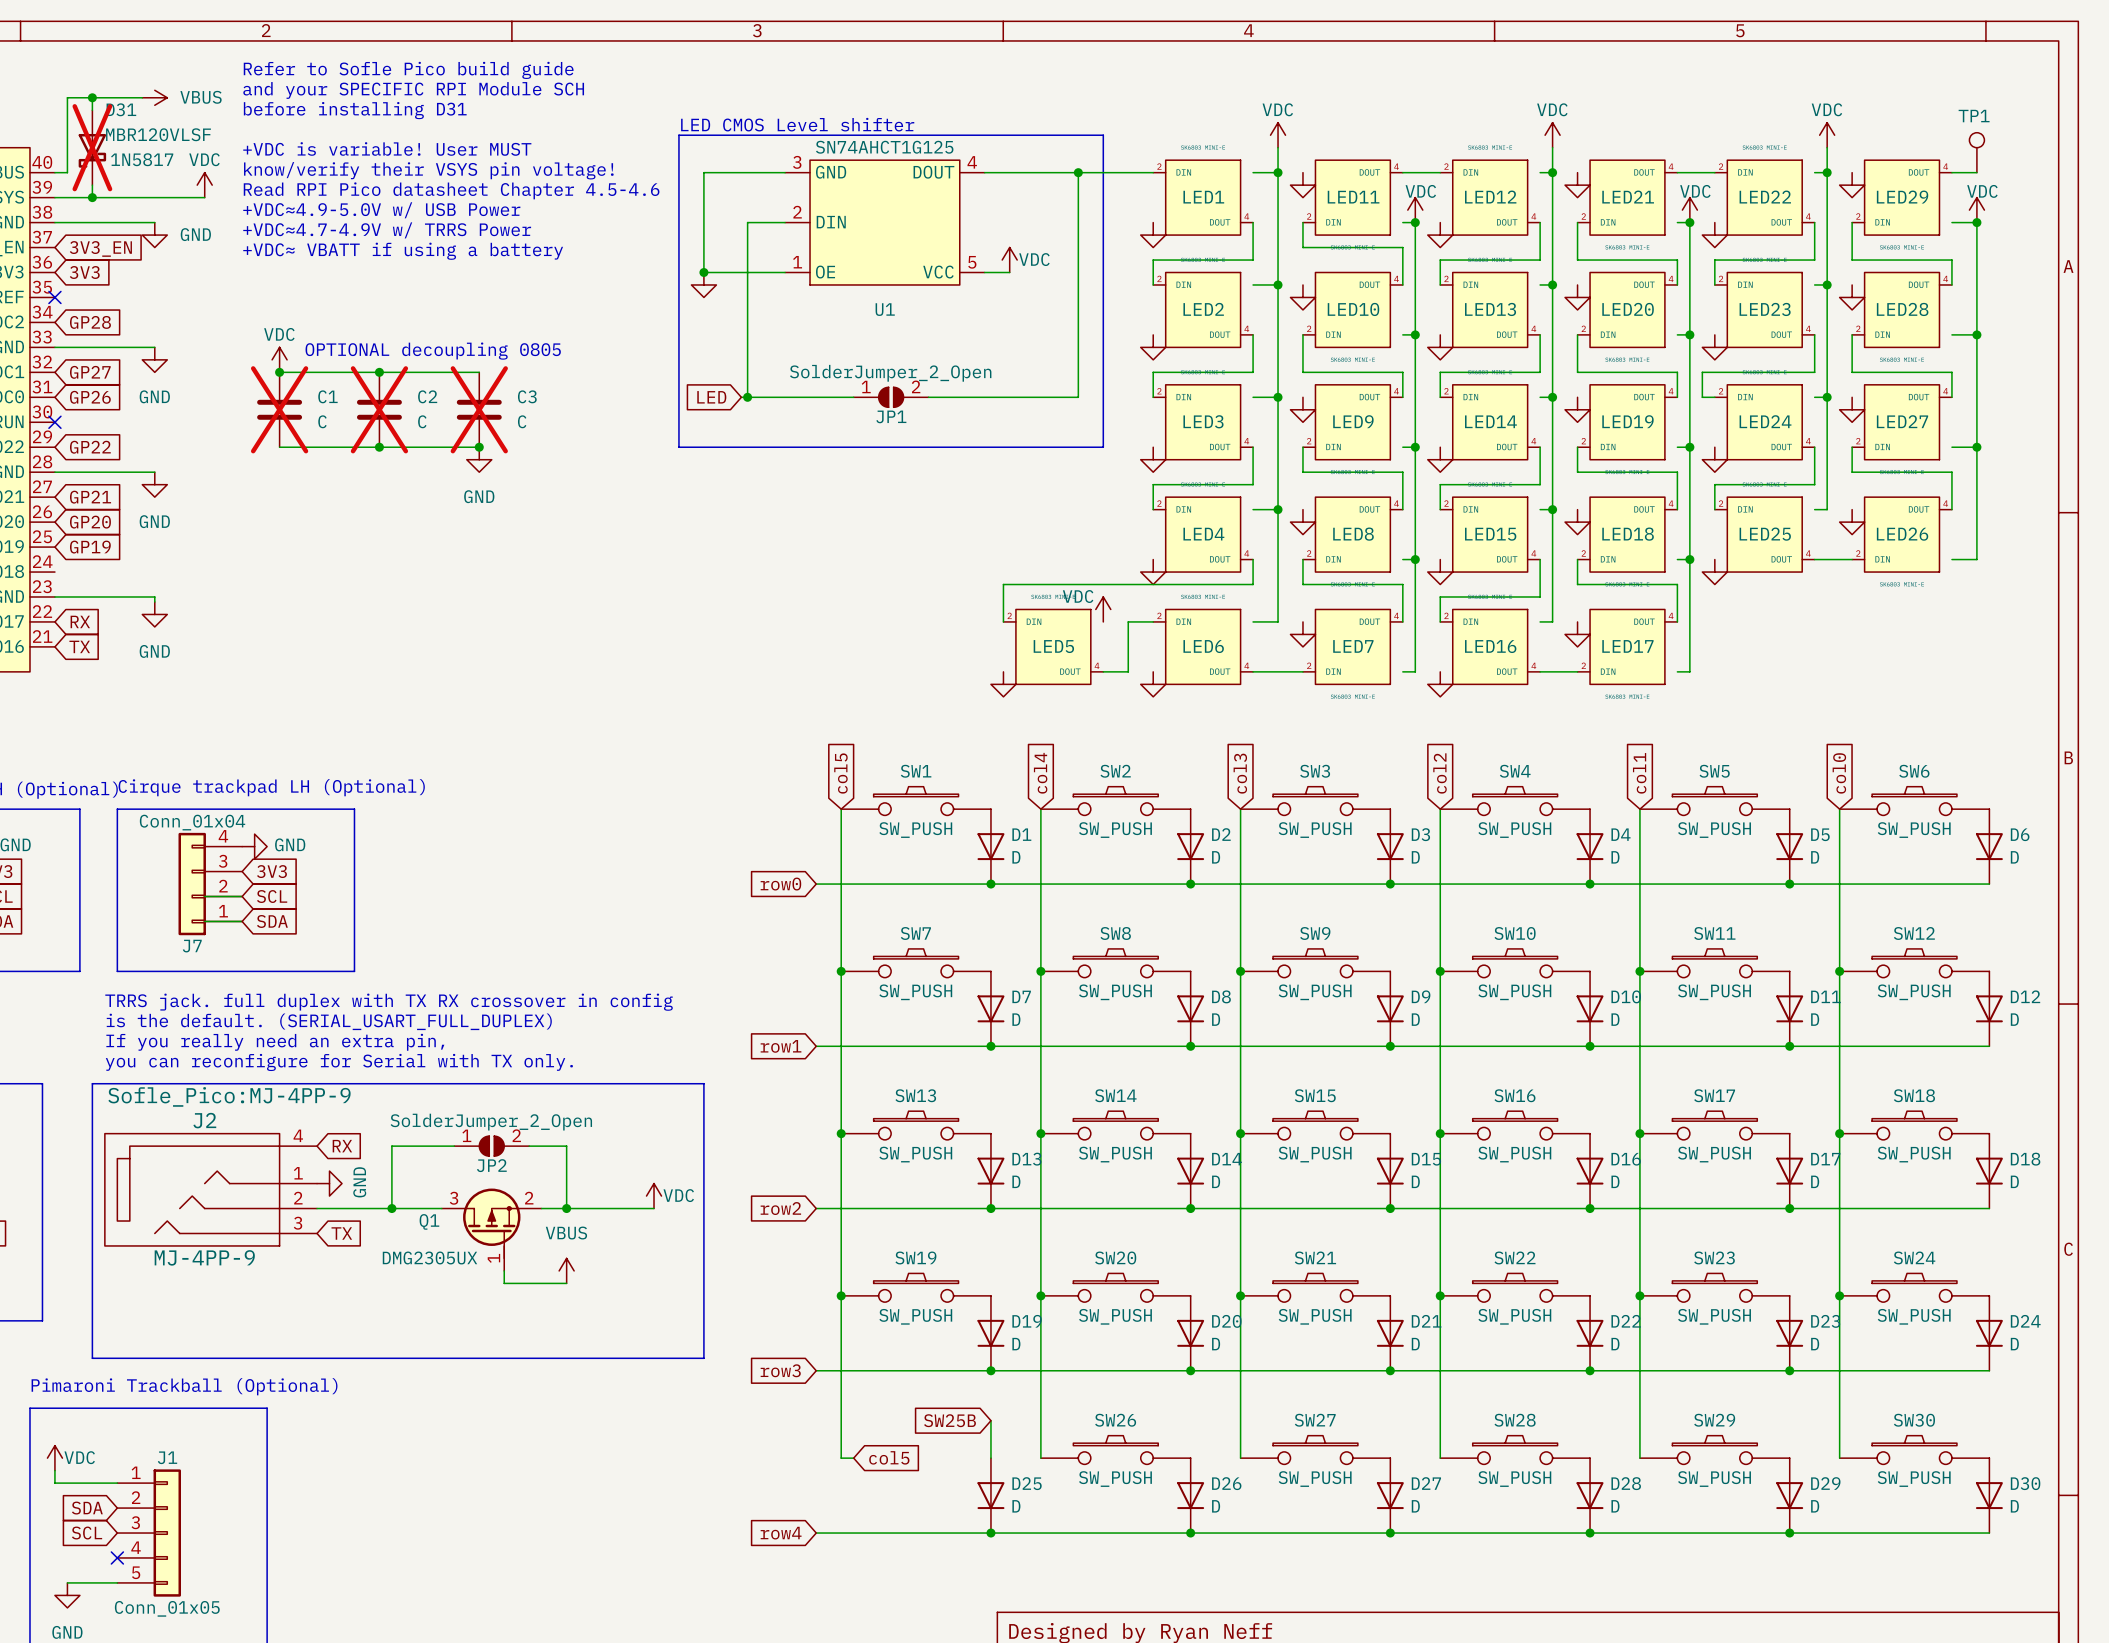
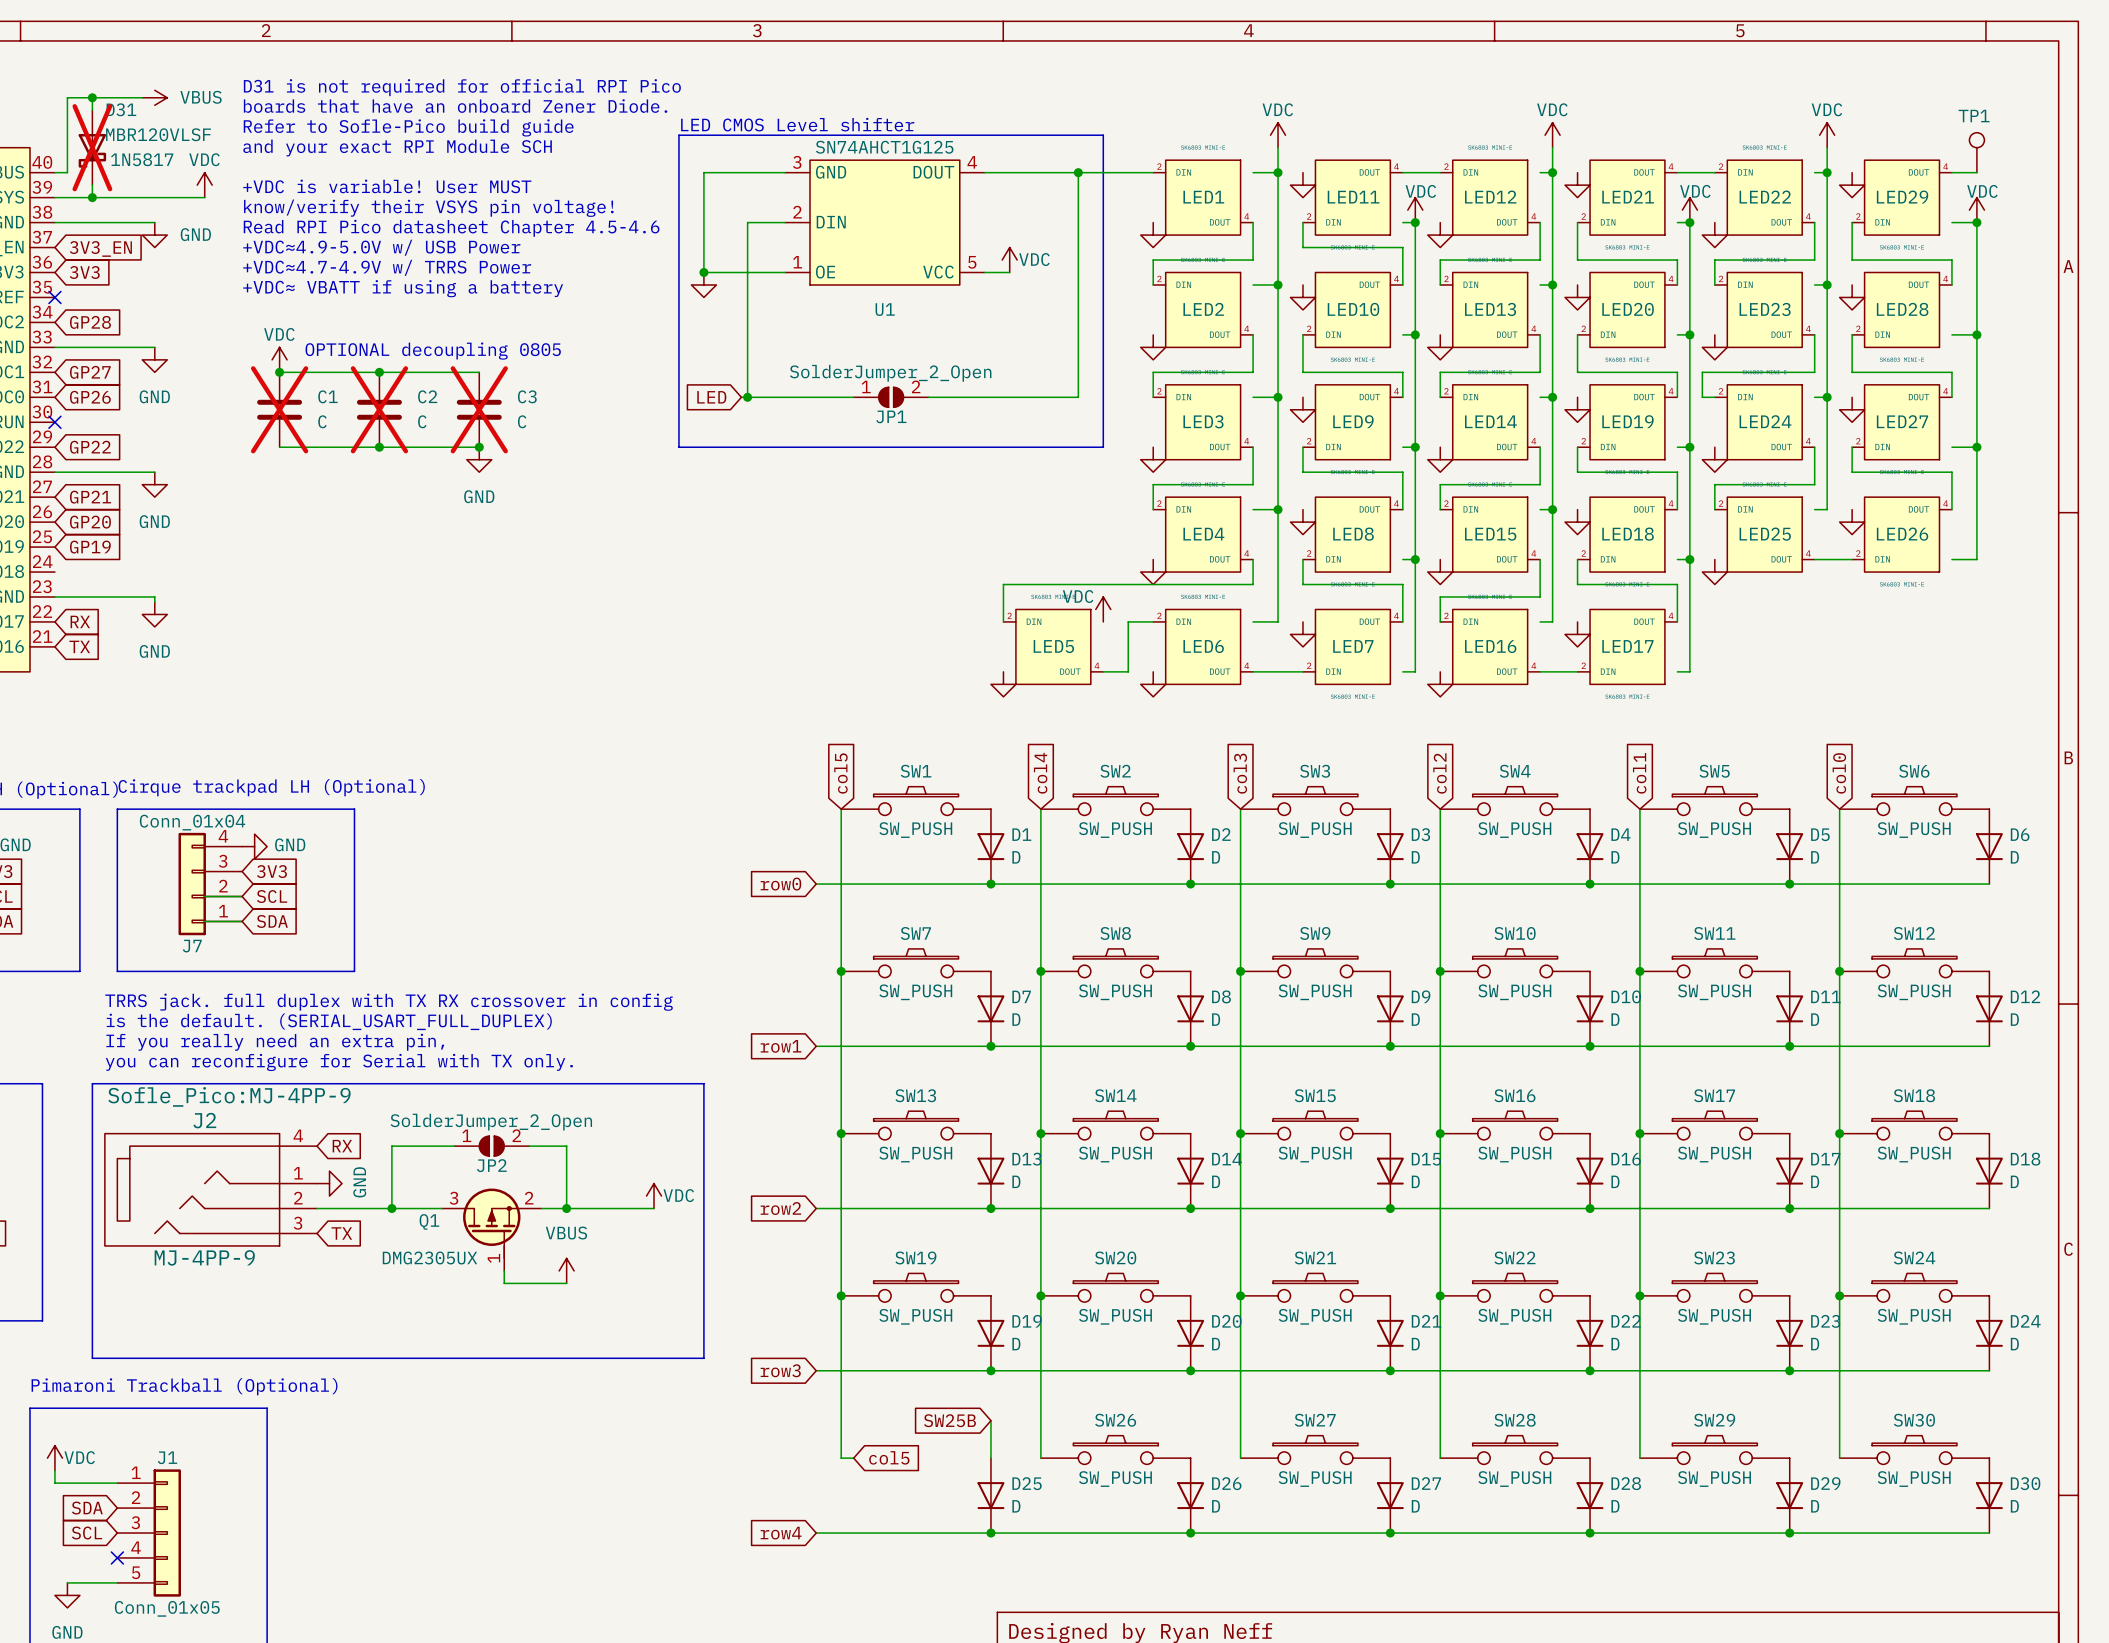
text: Refer to Sofle Pico build guide (408, 70) -> none
text: and your SPECIFIC RPI Module SCH (413, 90) -> D31 is not required for official RPI Pico (462, 87)
text: before installing D31 (355, 110) -> boards that have an onboard Zener Diode. (455, 106)
text: none -> Refer to Sofle-Pico build guide (408, 127)
text: +VDC is variable! User MUST (387, 148) -> and your exact RPI Module SCH (397, 148)
text: know/verify their VSYS pin voltage! (428, 170) -> none
text: Read RPI Pico datasheet Chapter 4.5-4.6 (451, 190) -> +VDC is variable! User MUST (387, 186)
text: +VDC≈4.9-5.0V w/ USB Power (381, 210) -> know/verify their VSYS pin voltage! (428, 208)
text: +VDC≈4.7-4.9V w/ TRRS Power (387, 230) -> Read RPI Pico datasheet Chapter 4.5-4.6 (451, 228)
text: +VDC≈ VBATT if using a battery (403, 251) -> +VDC≈4.9-5.0V w/ USB Power (381, 247)
text: none -> +VDC≈4.7-4.9V w/ TRRS Power (387, 267)
text: none -> +VDC≈ VBATT if using a battery (403, 288)

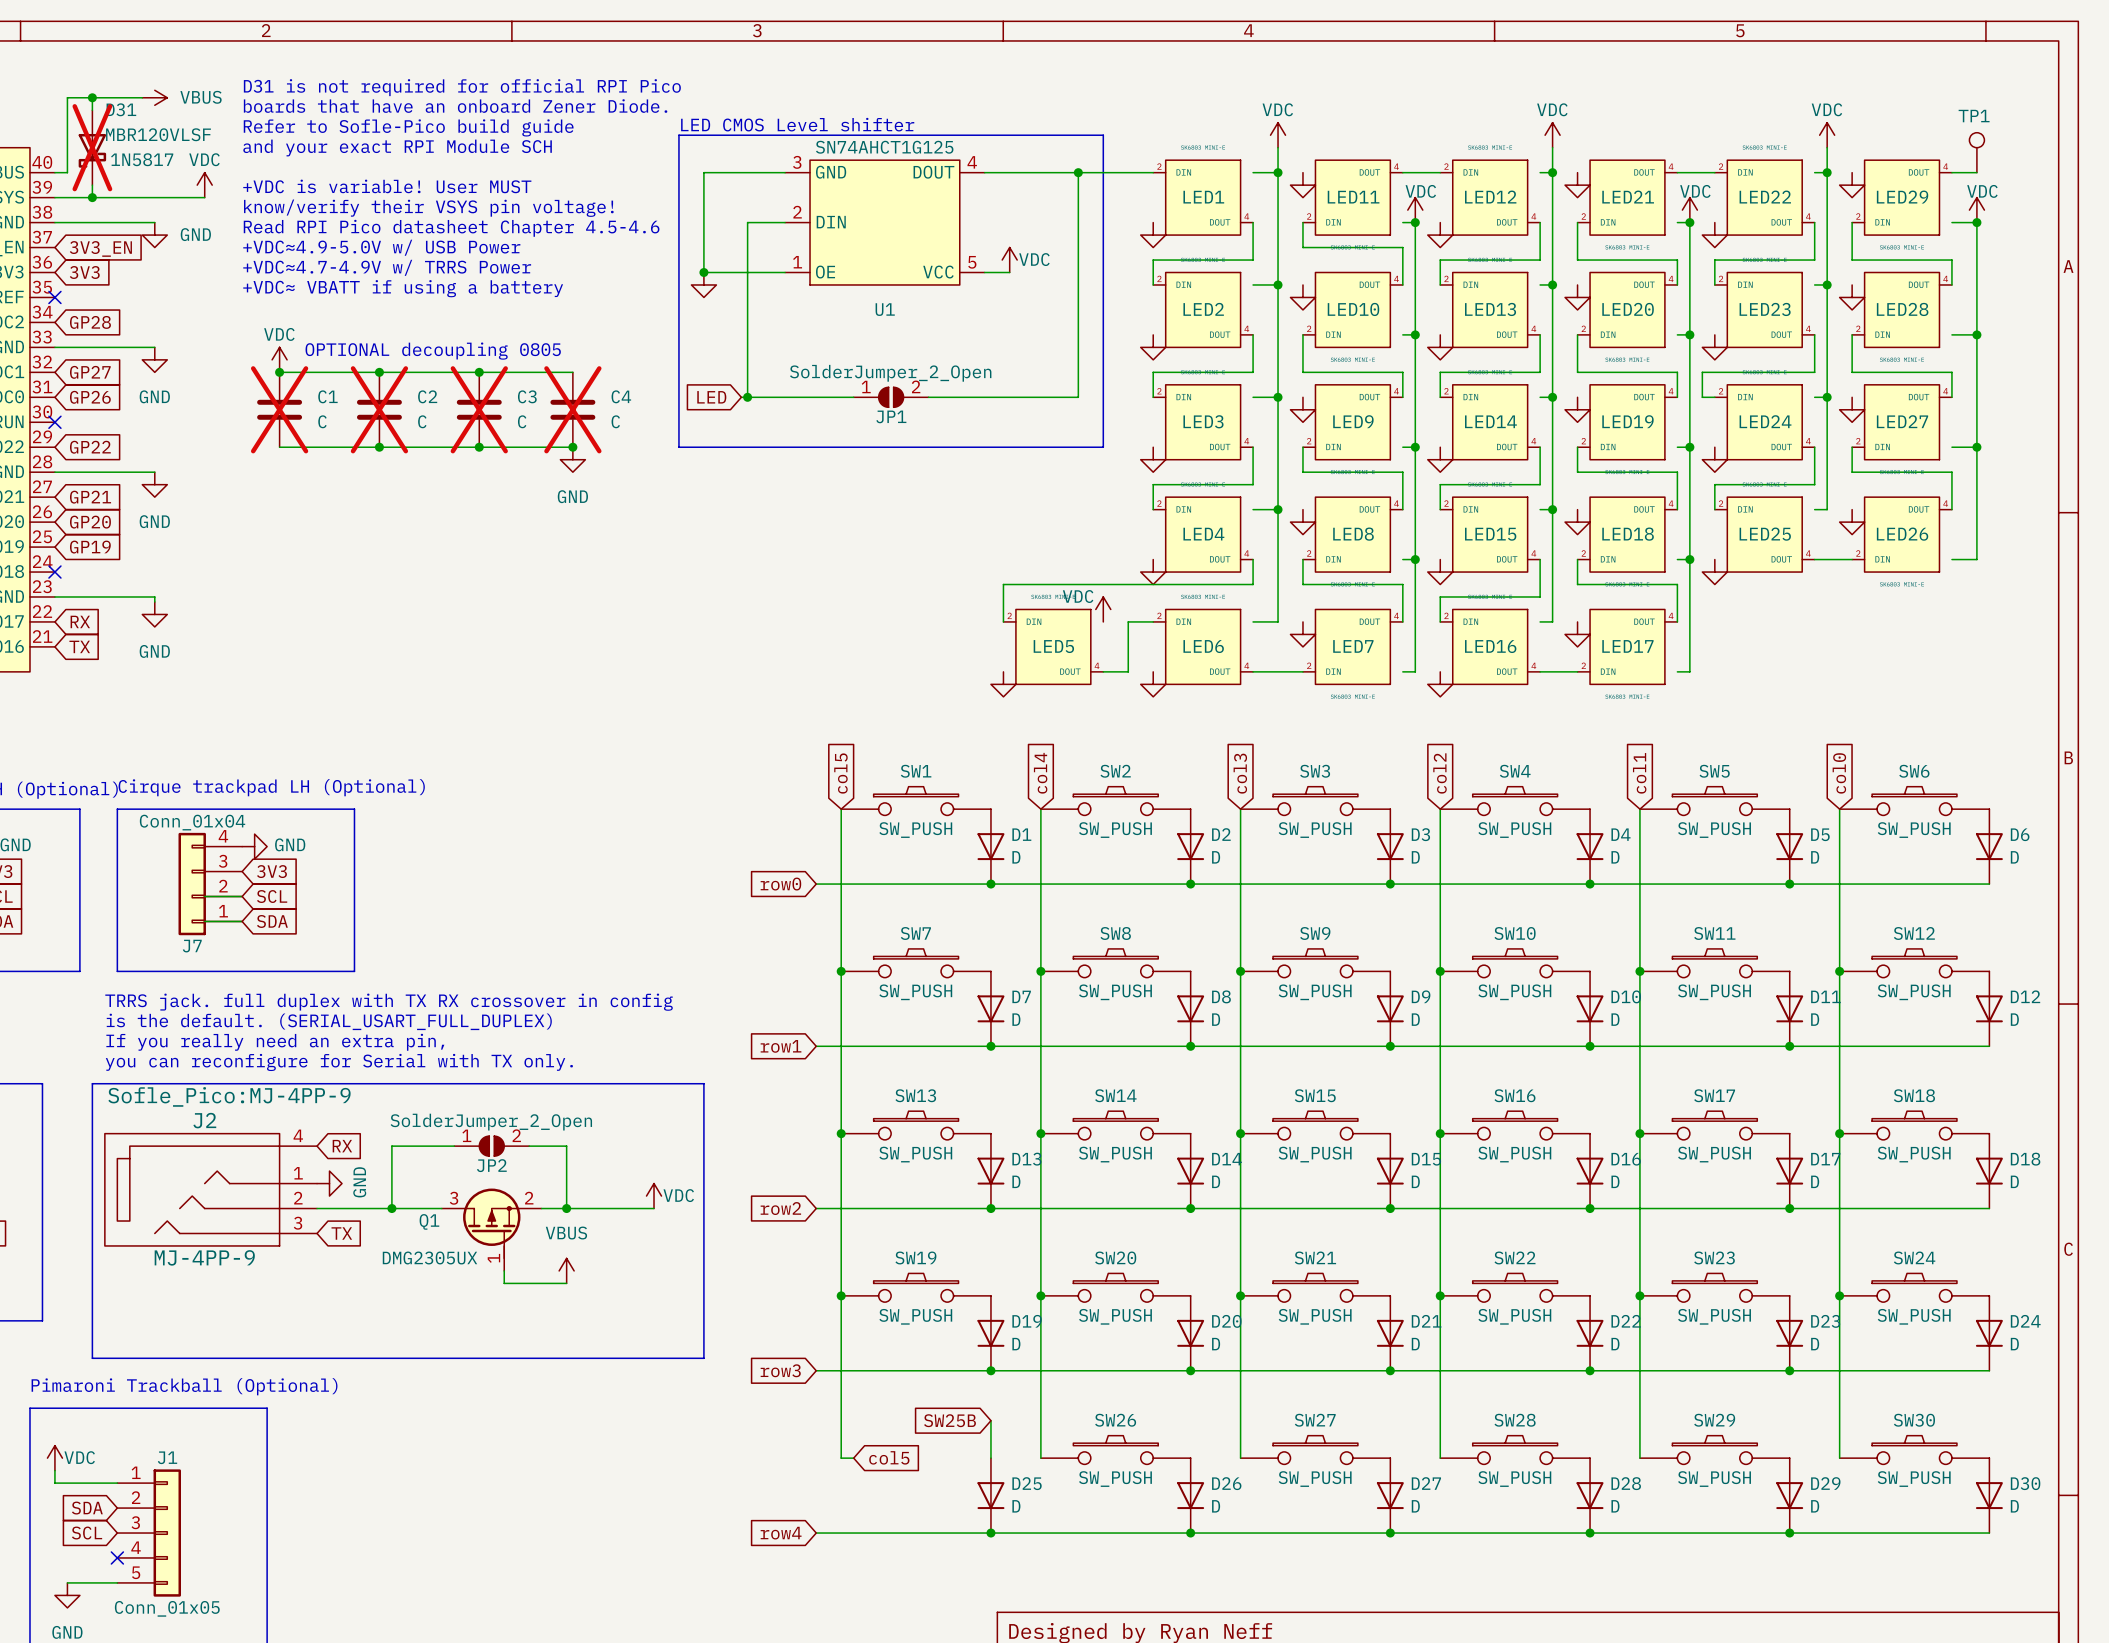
wire: none -> (479, 372) (572, 372)
junction: none -> (479, 372)
C4: none -> C (572, 409)
wire: none -> (479, 447) (572, 447)
junction: none -> (572, 447)
power symbol position: GND (479, 459) -> GND (572, 459)
no-connect mark: none -> (54, 572)

